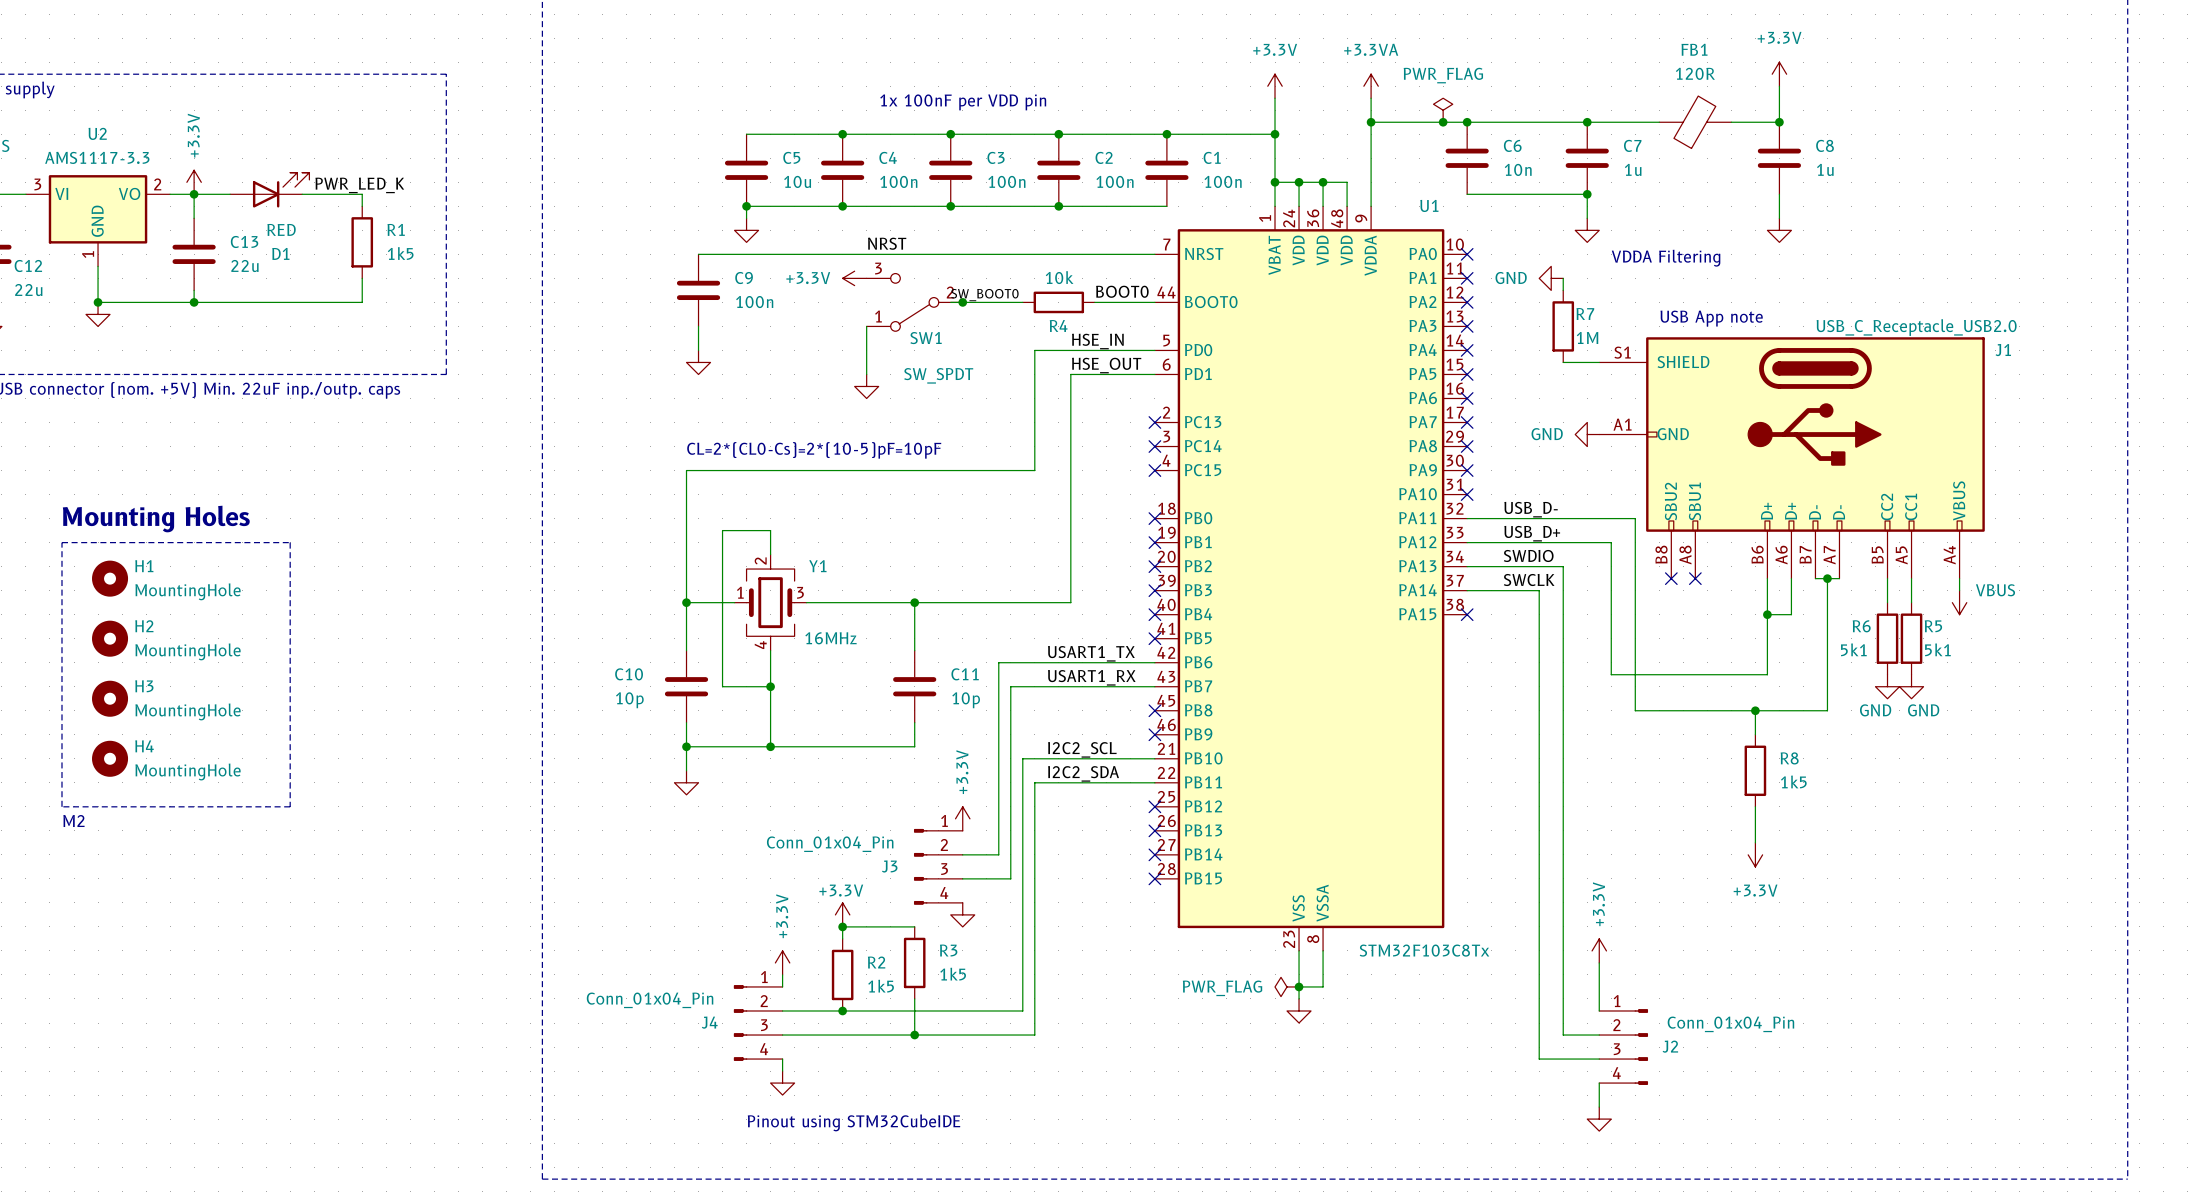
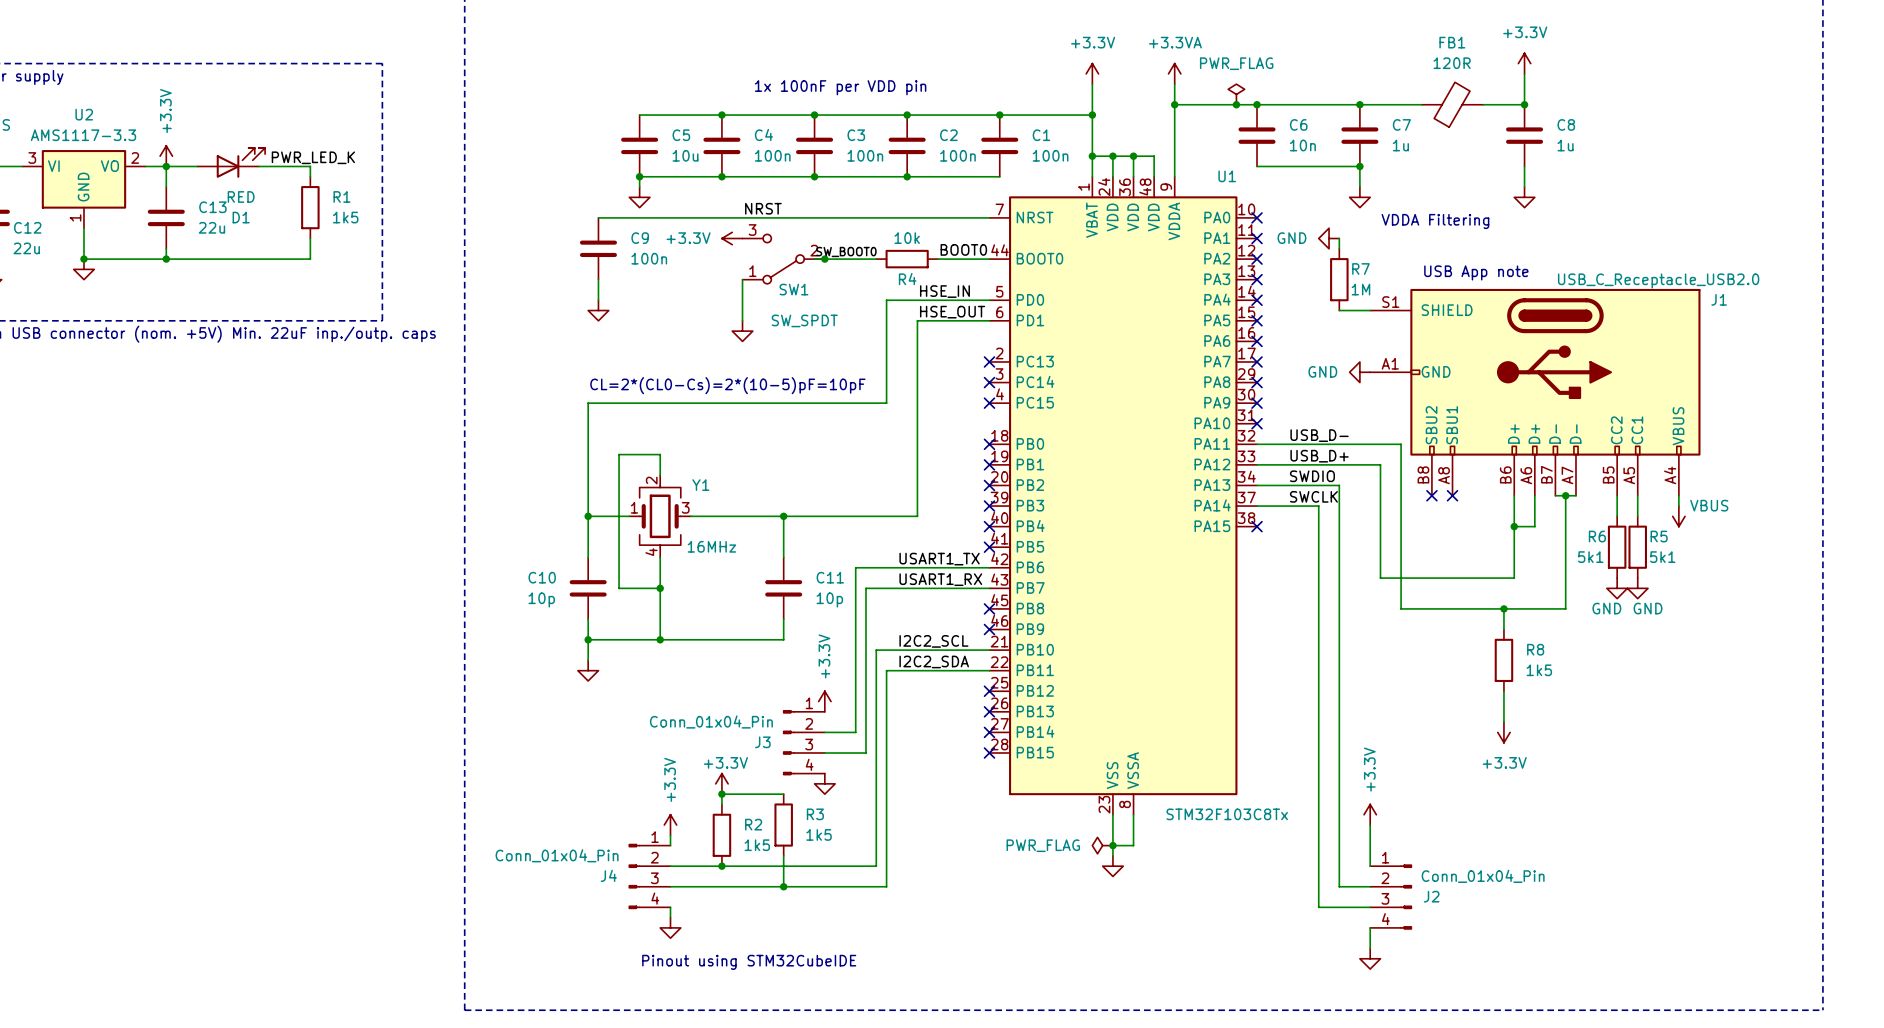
text: Mounting Holes (156, 519) -> none
line: (61, 542) (290, 542) (290, 806) (61, 806) (61, 542) -> none
H1: MountingHole (110, 578) -> none
H2: MountingHole (110, 638) -> none
H3: MountingHole (110, 698) -> none
H4: MountingHole (110, 758) -> none
text: M2 (73, 821) -> none

